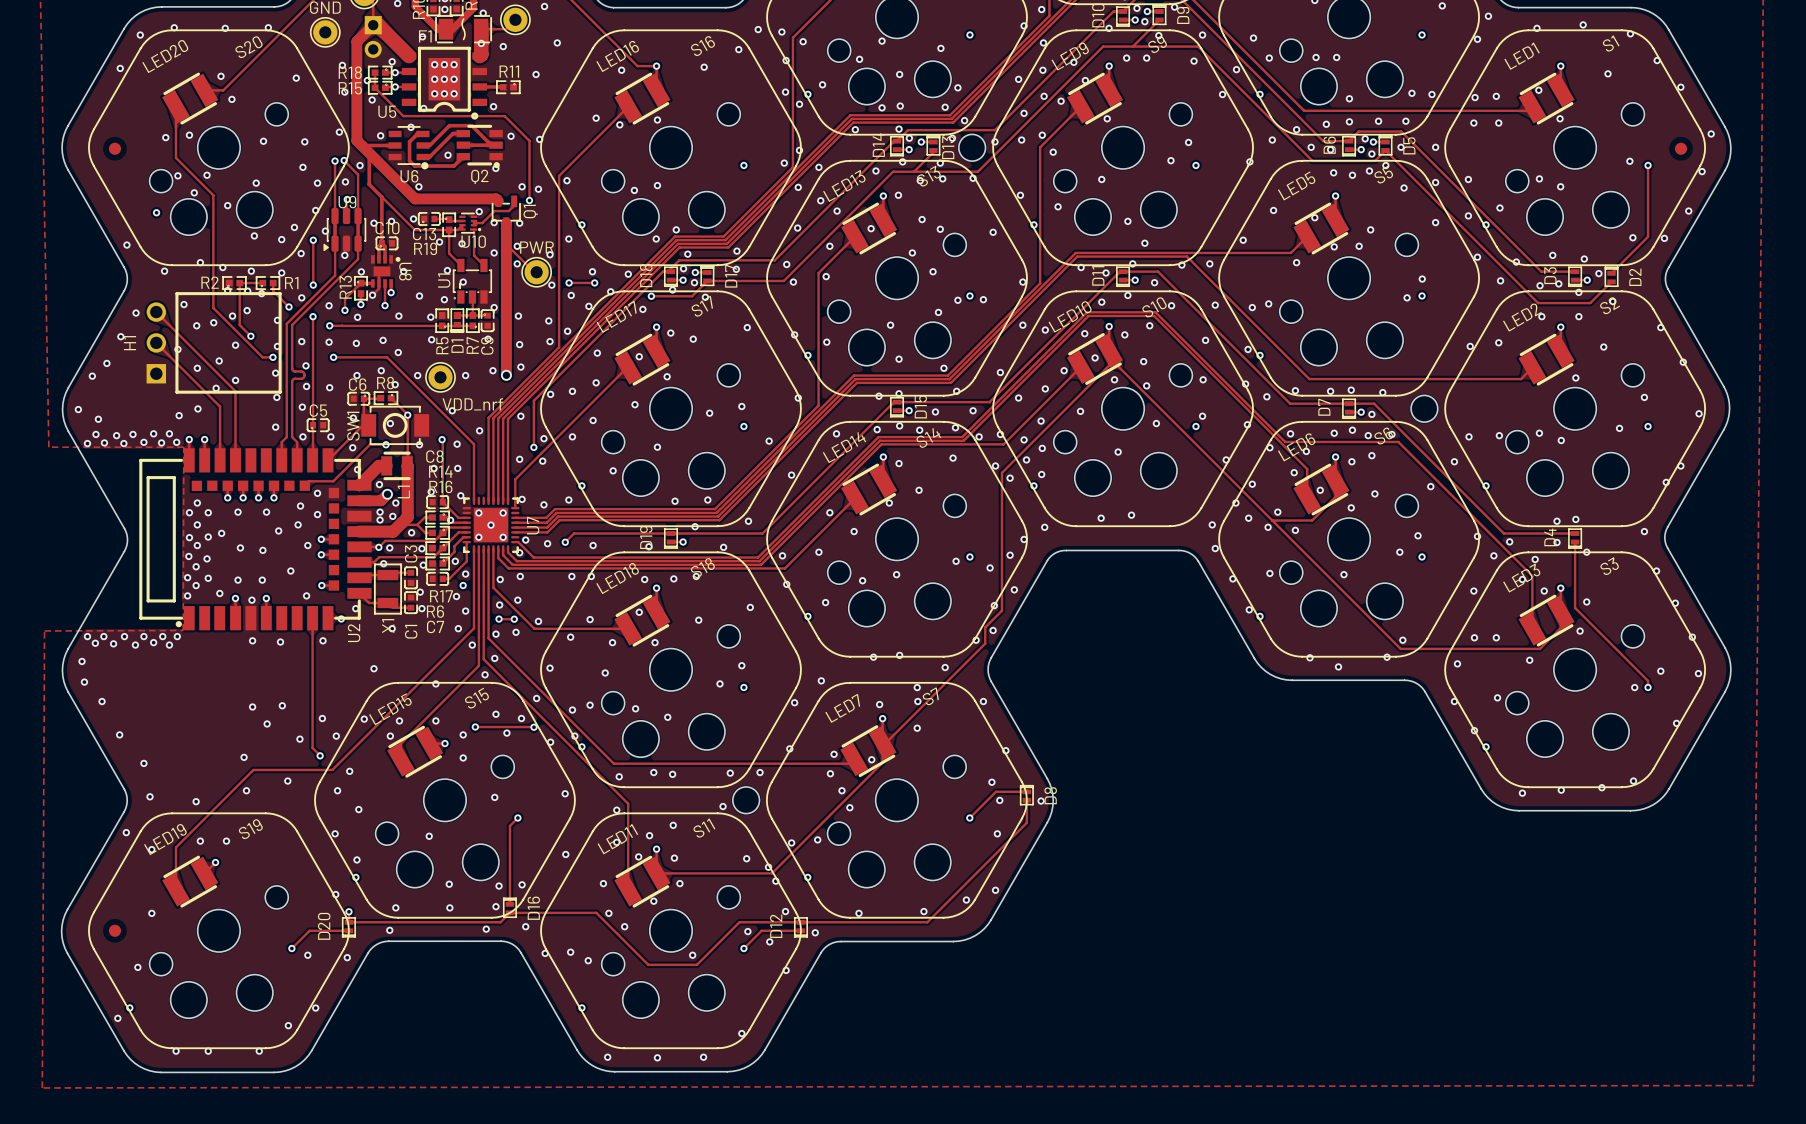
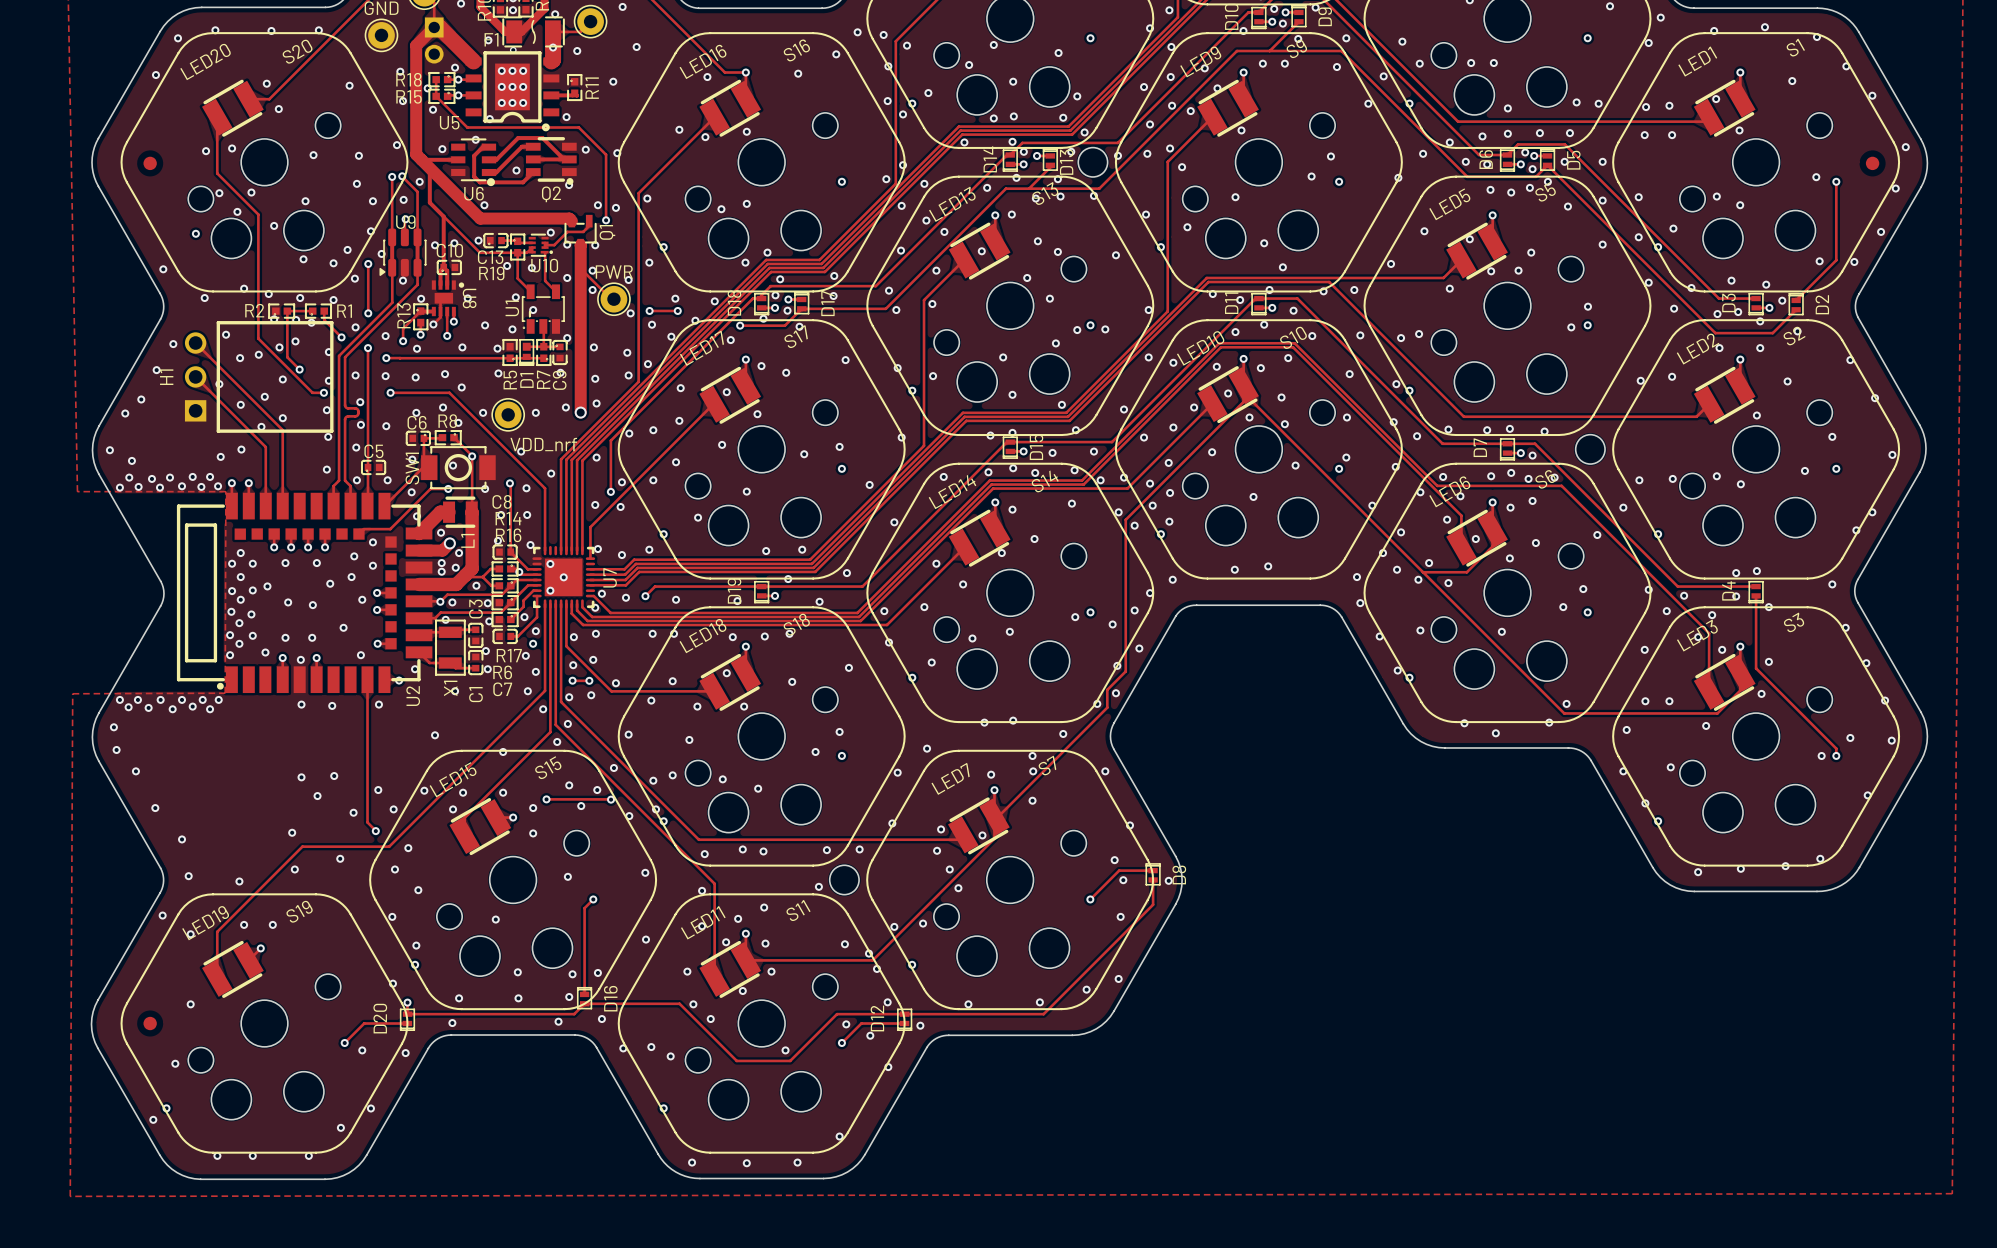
via: none -> (513, 50)
R11 rotation: 0° (508, 87) -> 90° counterclockwise (574, 87)
via: (503, 512) -> none
via: (503, 537) -> none

